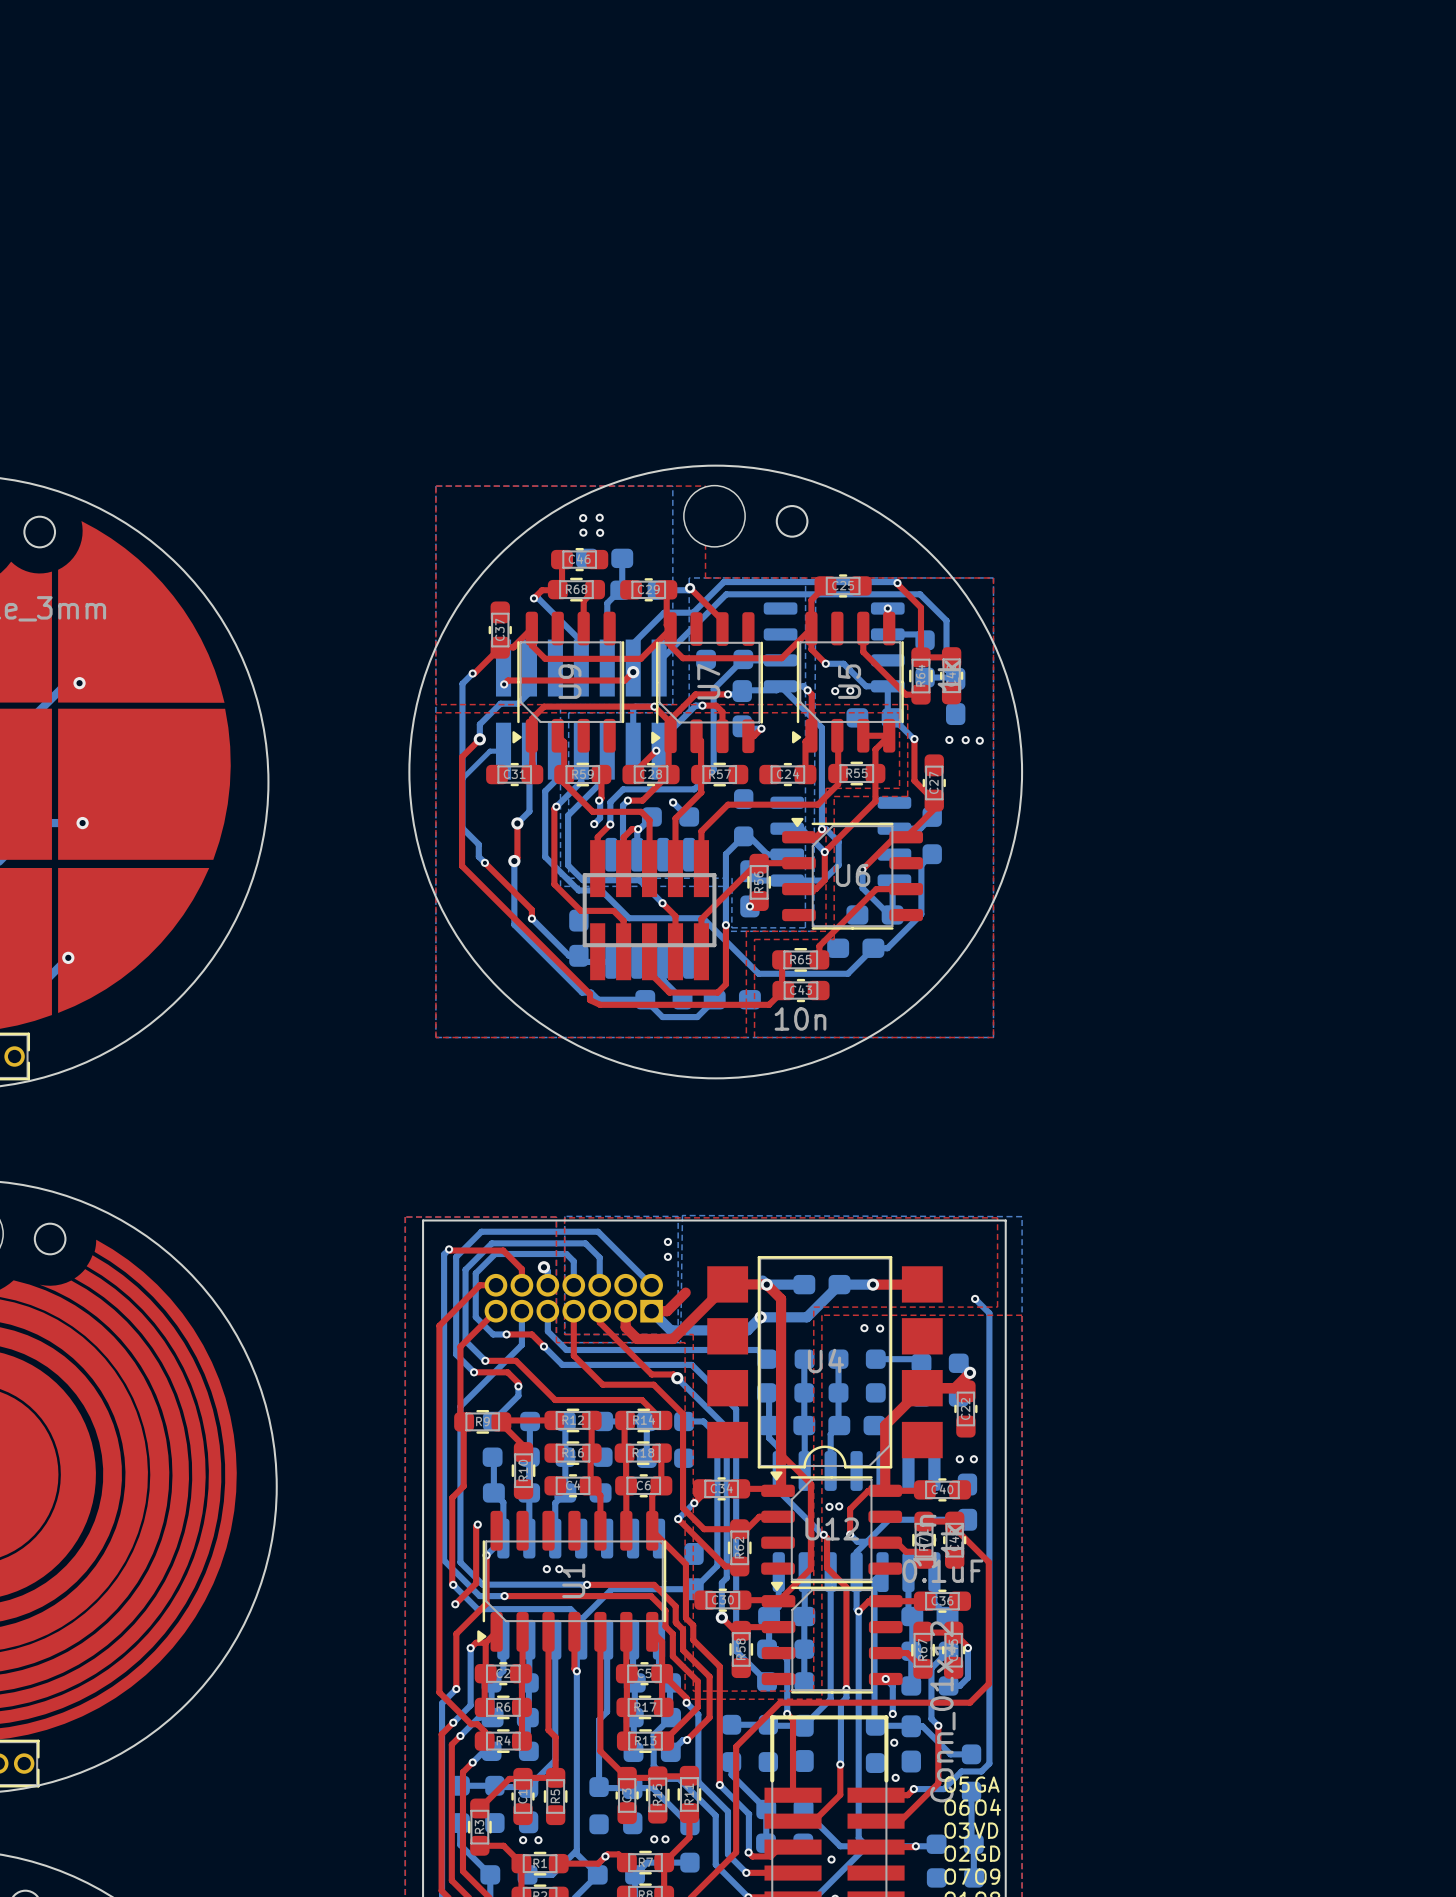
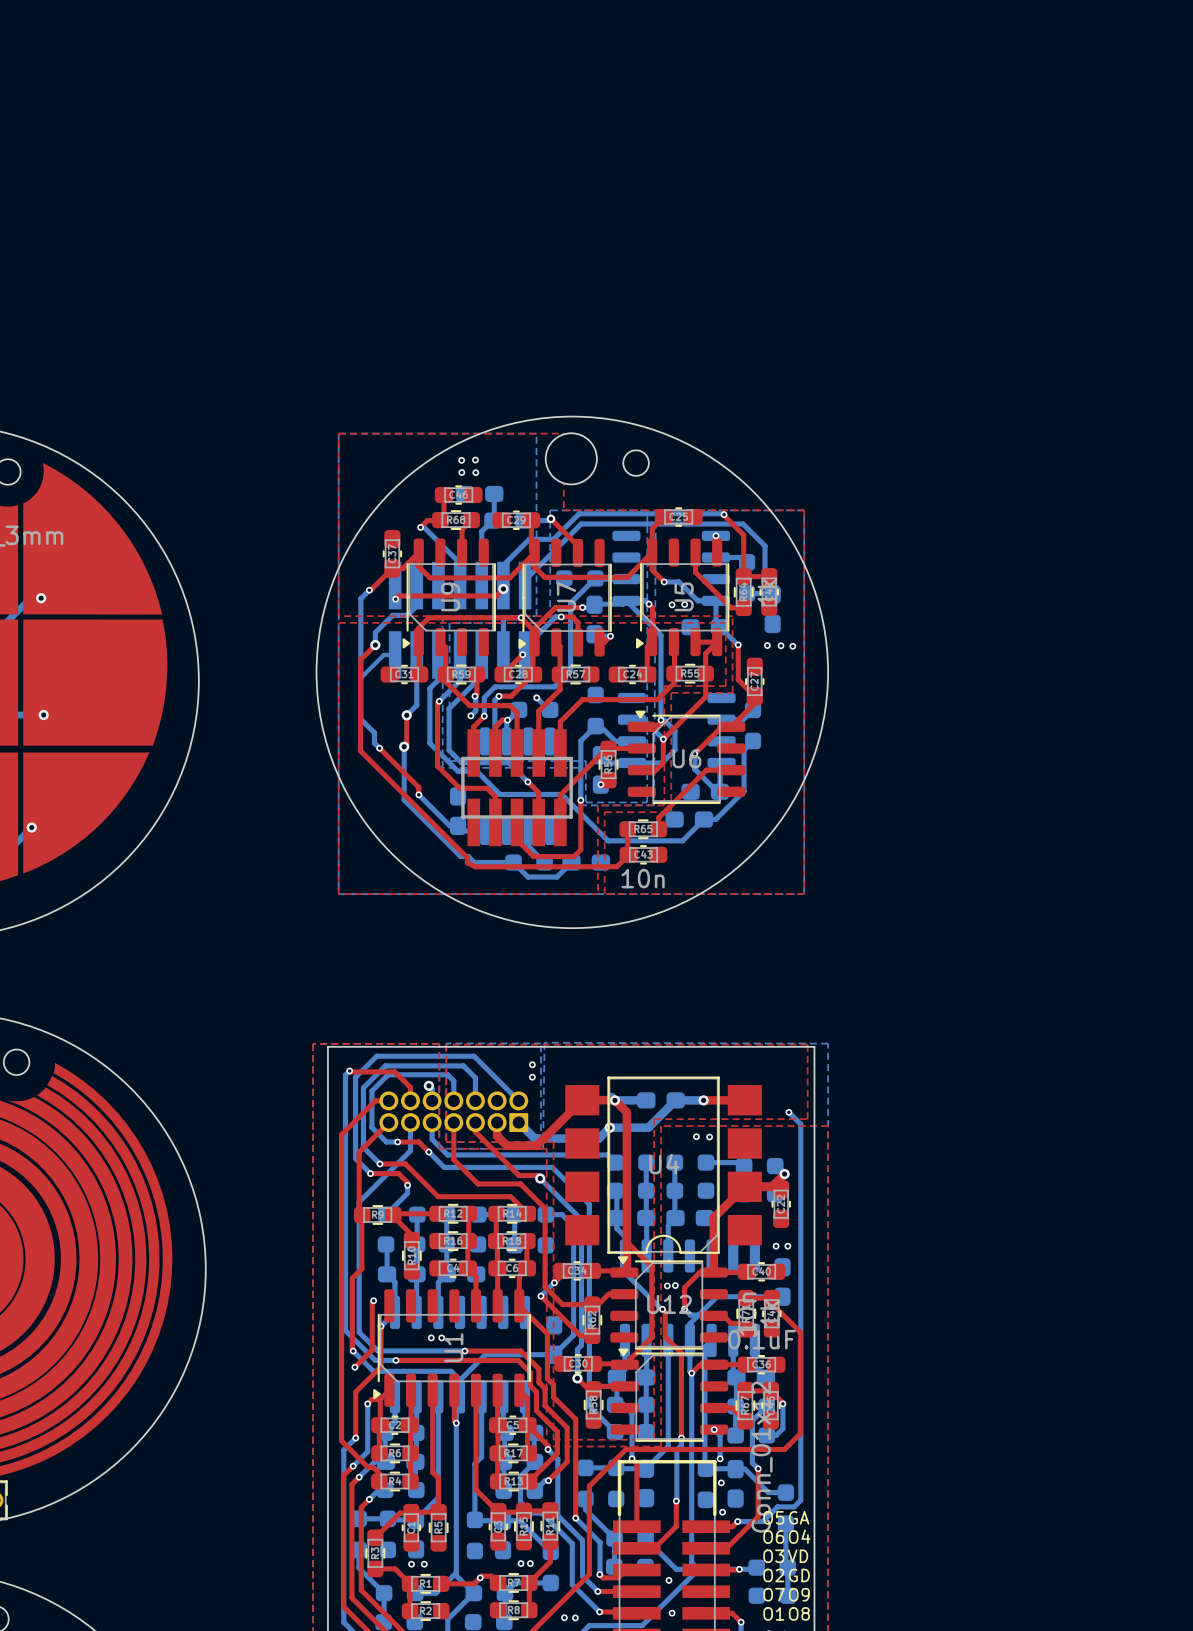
top track: (685, 1292) (667, 1311) (651, 1311) -> none

